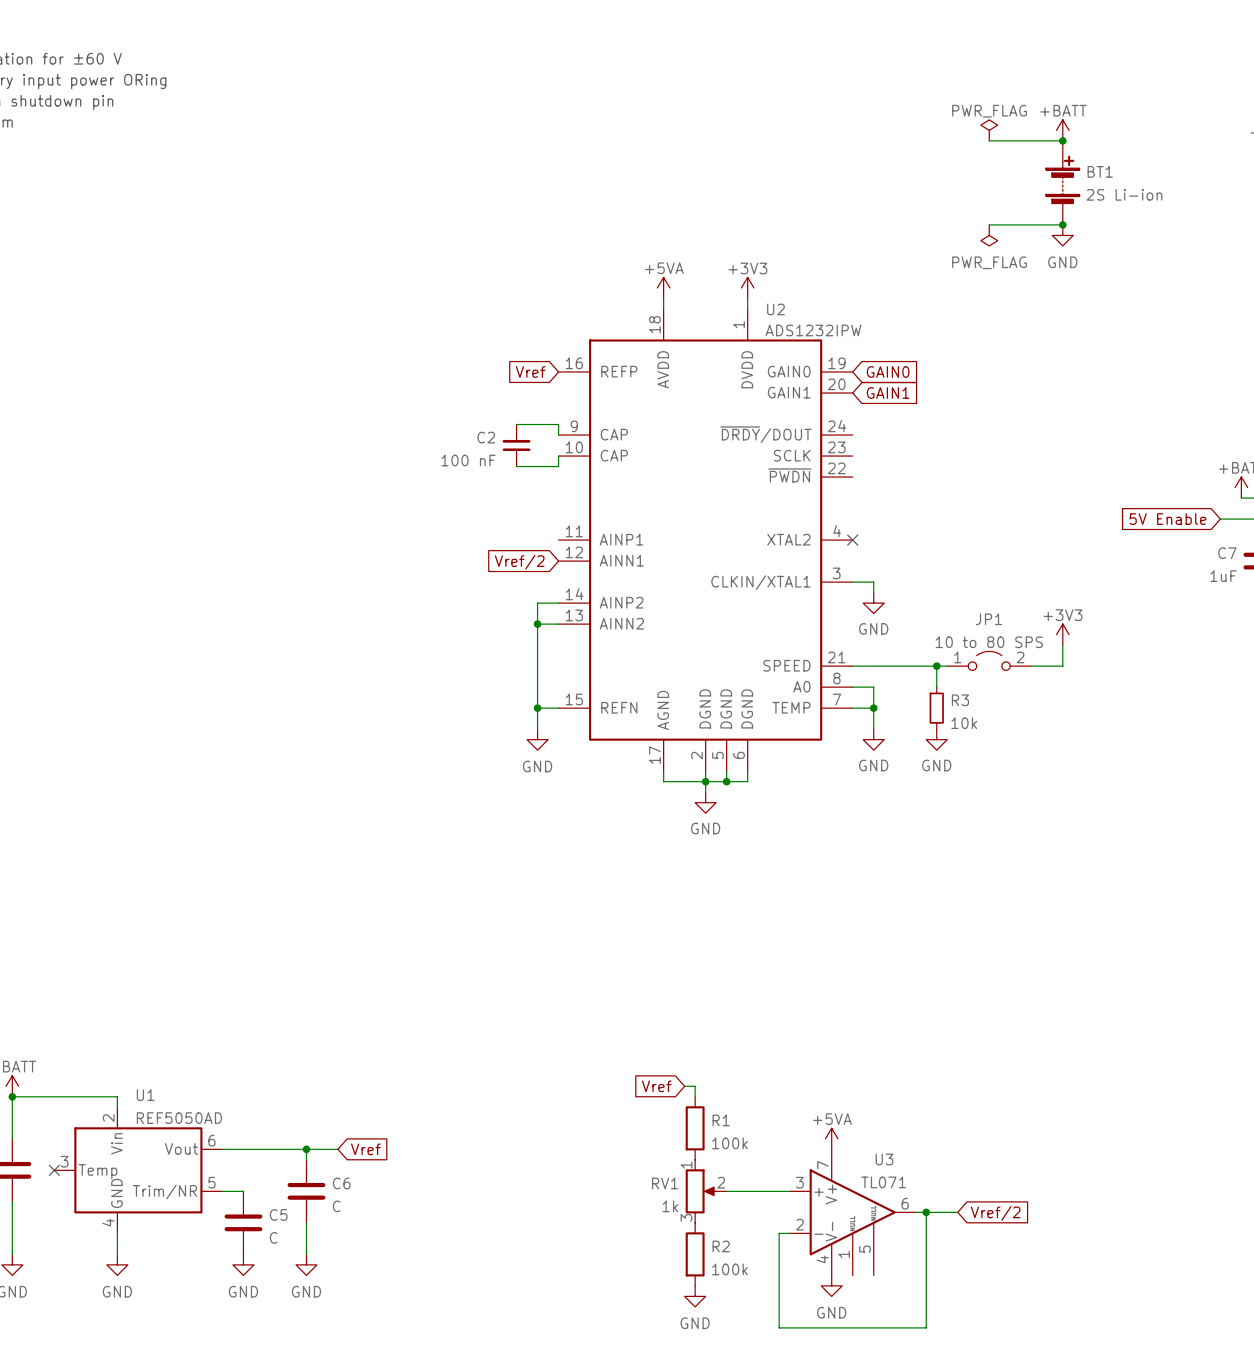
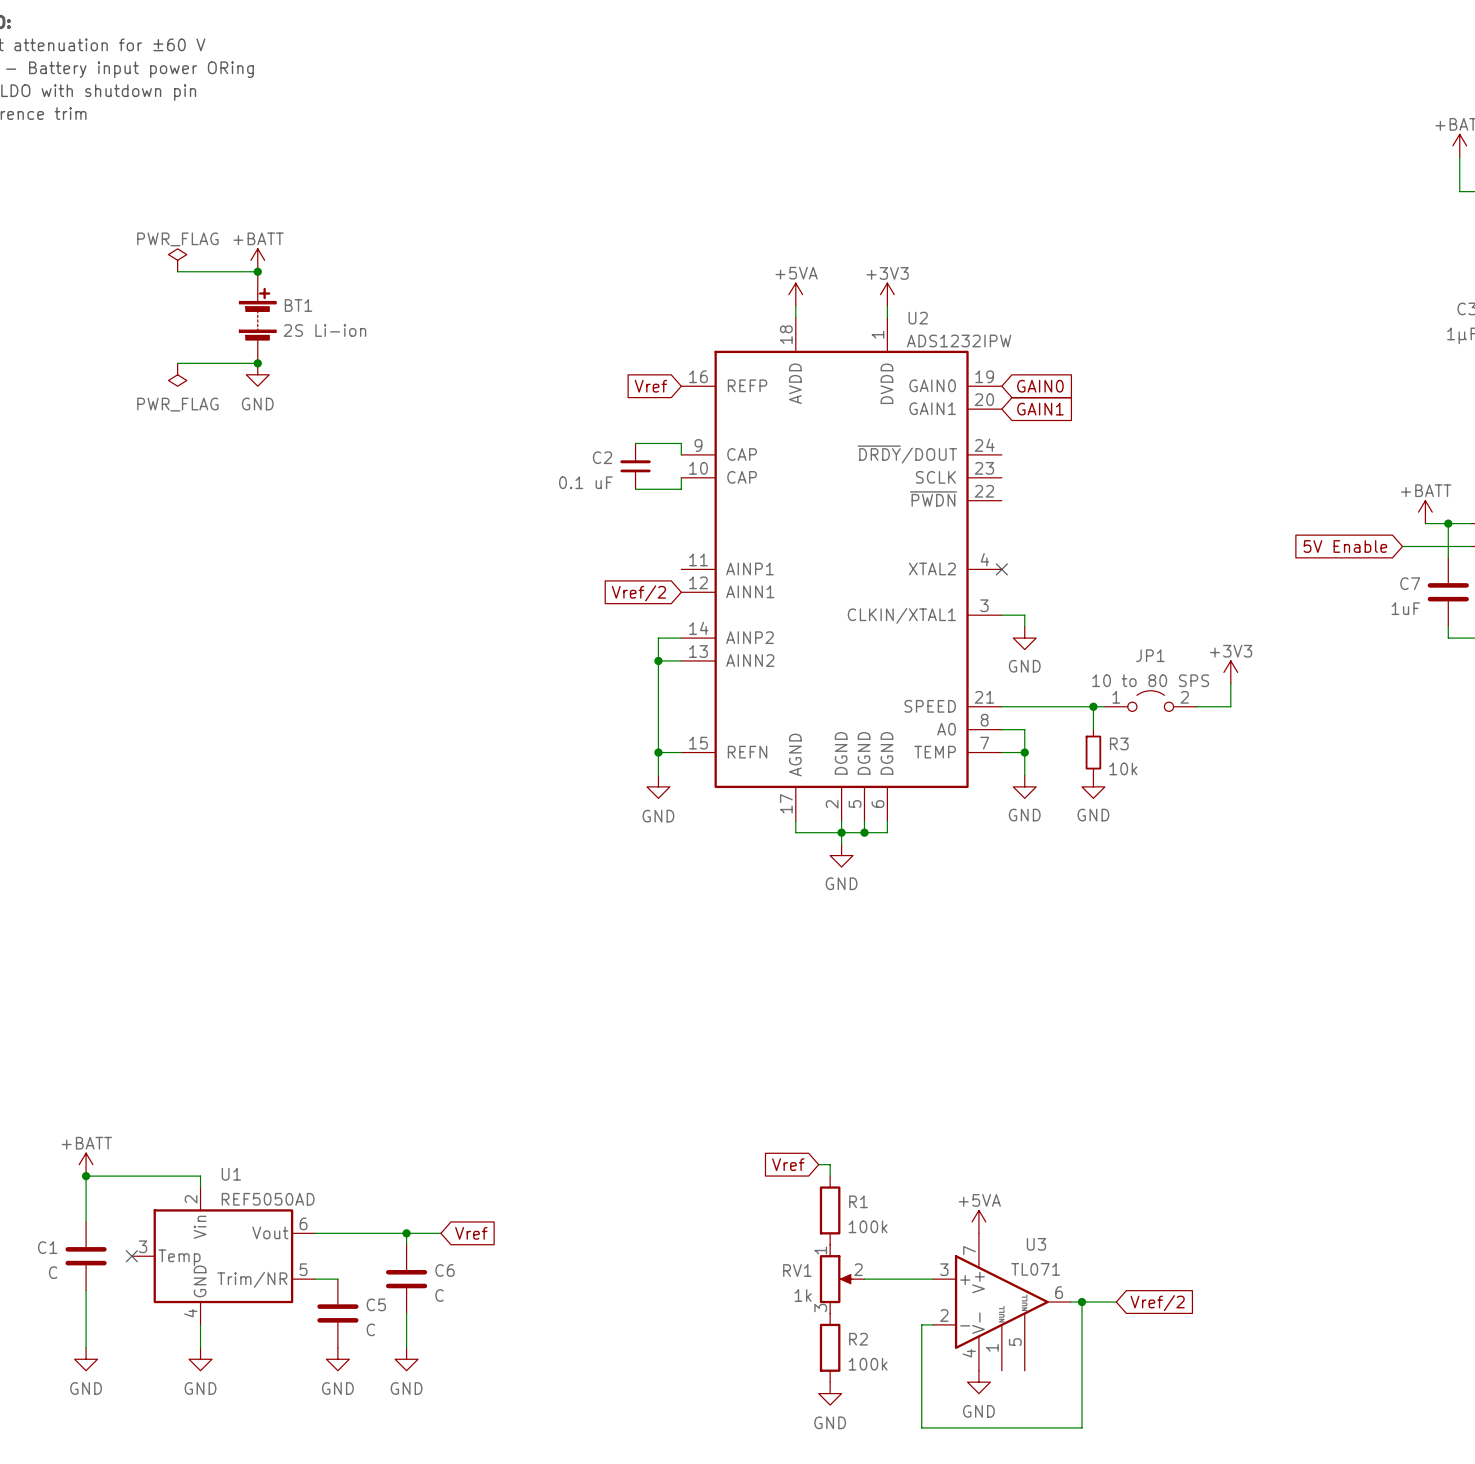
power symbol: PWR_FLAG (989, 130) -> none
power symbol: +BATT (1062, 130) -> none
wire: (989, 140) (1062, 140) -> none
junction: (1062, 140) -> none
BT1 position: (1062, 182) -> (257, 317)
wire: (989, 224) (1062, 224) -> none
junction: (1062, 224) -> none
power symbol: PWR_FLAG (989, 235) -> none
power symbol: GND (1062, 235) -> none
power symbol: none -> PWR_FLAG (177, 260)
power symbol: none -> +BATT (257, 260)
wire: none -> (177, 271) (257, 271)
junction: none -> (257, 271)
wire: none -> (177, 363) (257, 363)
junction: none -> (257, 363)
power symbol: none -> PWR_FLAG (177, 374)
power symbol: none -> GND (257, 374)
C2 value: 100 nF (468, 460) -> 0.1 uF (585, 482)

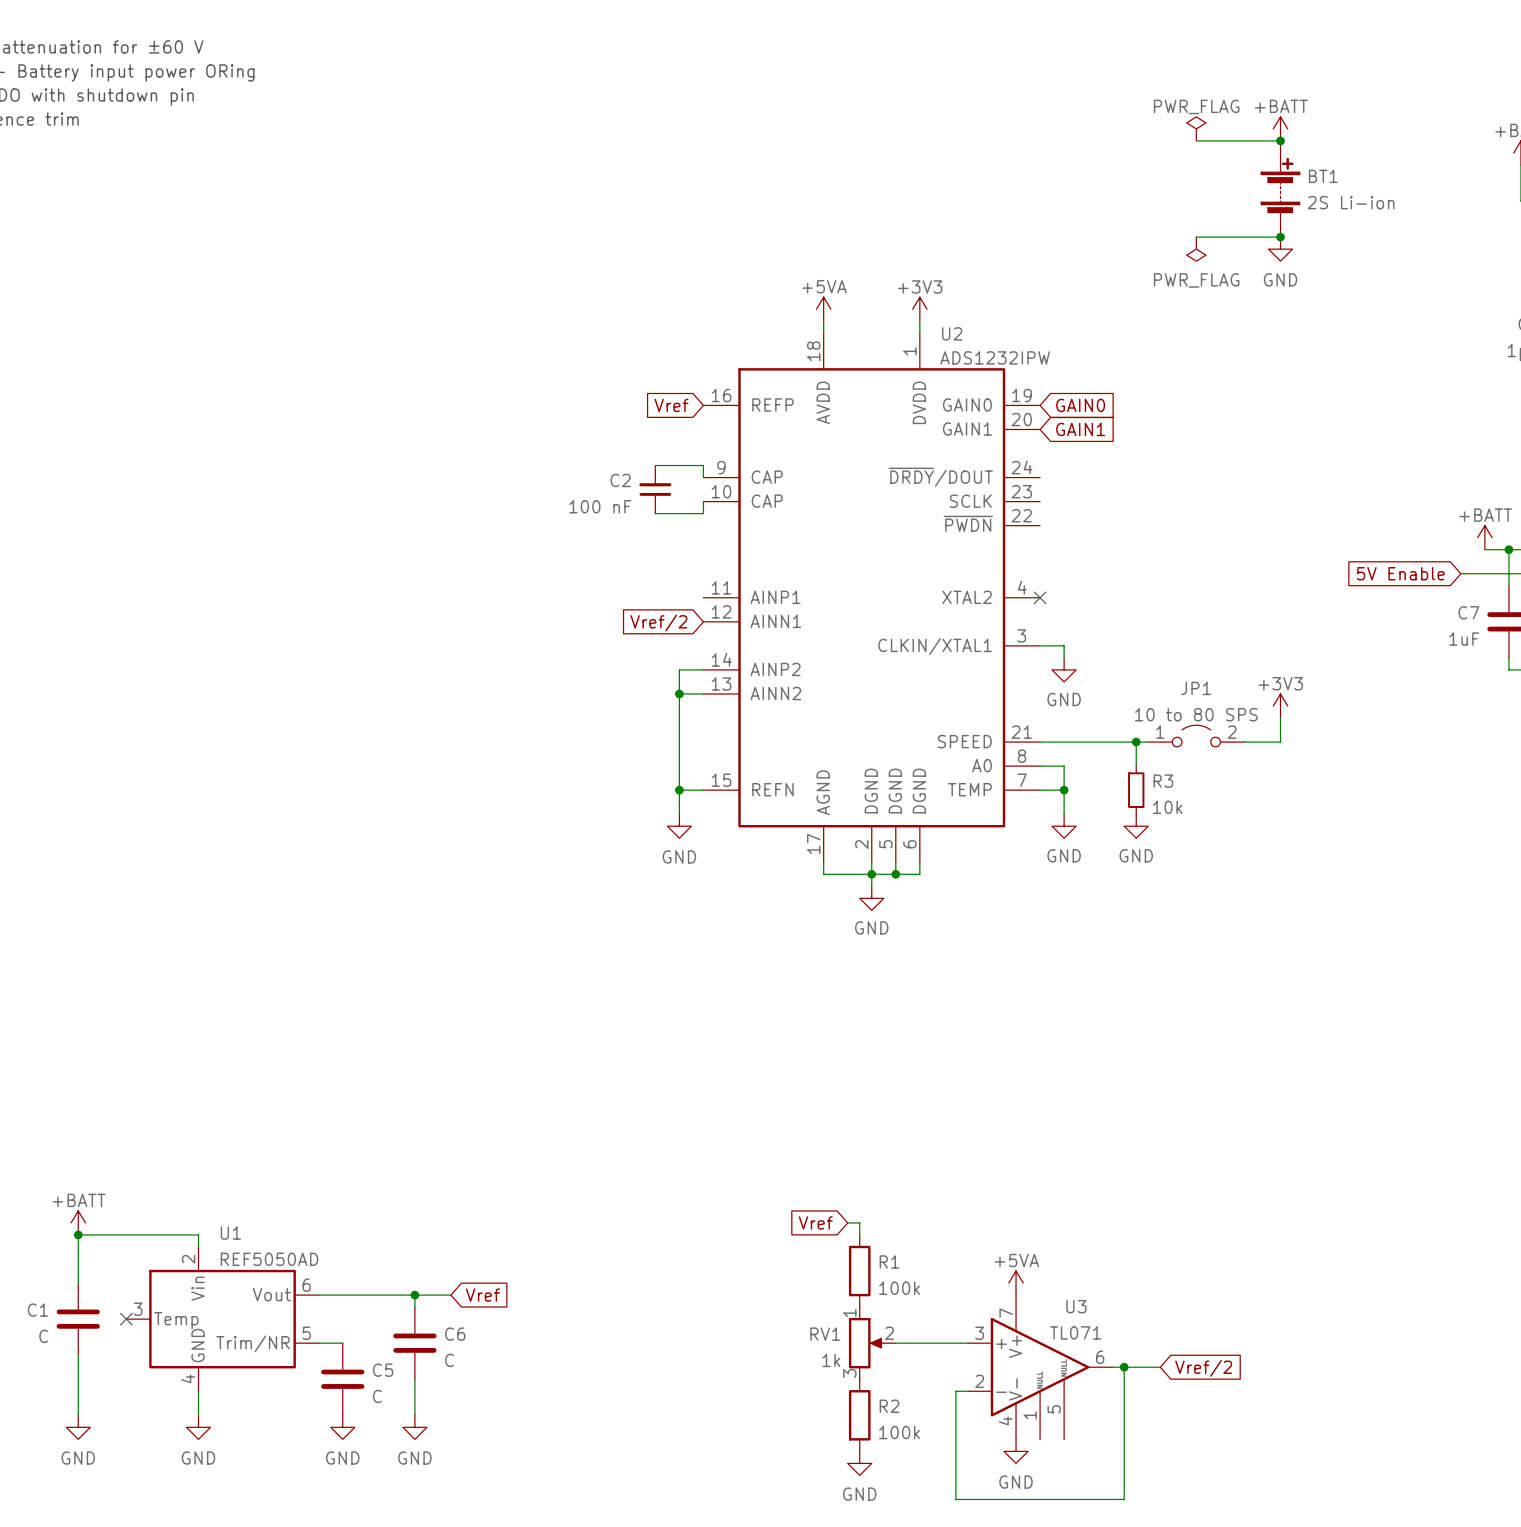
power symbol: none -> PWR_FLAG (1196, 128)
power symbol: none -> +BATT (1280, 128)
wire: none -> (1196, 140) (1280, 140)
junction: none -> (1280, 140)
wire: none -> (1196, 237) (1280, 237)
junction: none -> (1280, 237)
power symbol: none -> PWR_FLAG (1196, 249)
power symbol: none -> GND (1280, 249)
power symbol: PWR_FLAG (177, 260) -> none
power symbol: +BATT (257, 260) -> none
wire: (177, 271) (257, 271) -> none
junction: (257, 271) -> none
BT1 position: (257, 317) -> (1280, 189)
wire: (177, 363) (257, 363) -> none
junction: (257, 363) -> none
power symbol: PWR_FLAG (177, 374) -> none
power symbol: GND (257, 374) -> none
C2 value: 0.1 uF (585, 482) -> 100 nF (600, 506)

